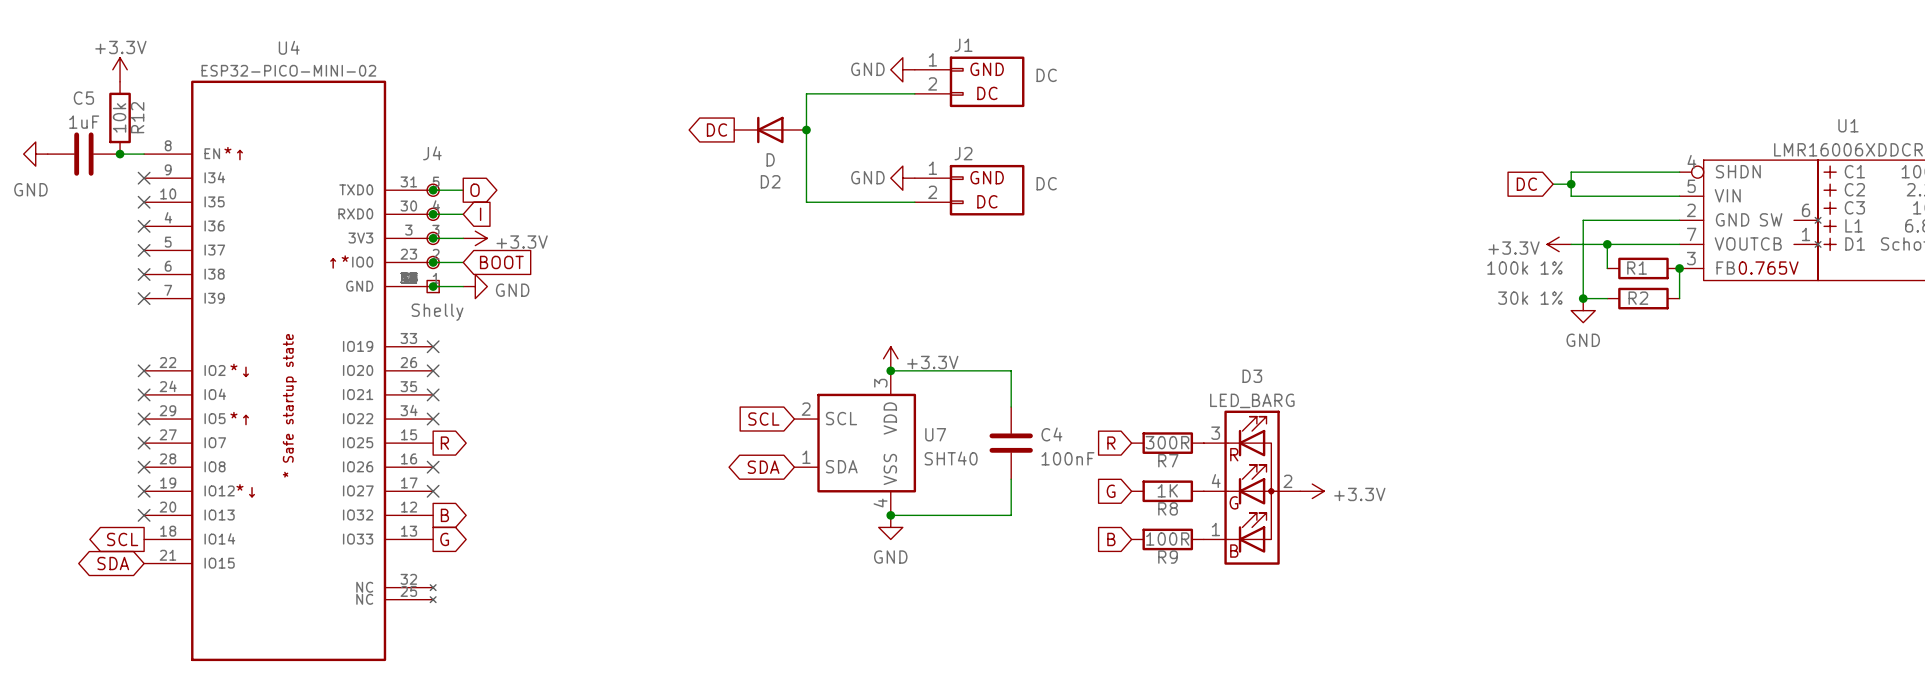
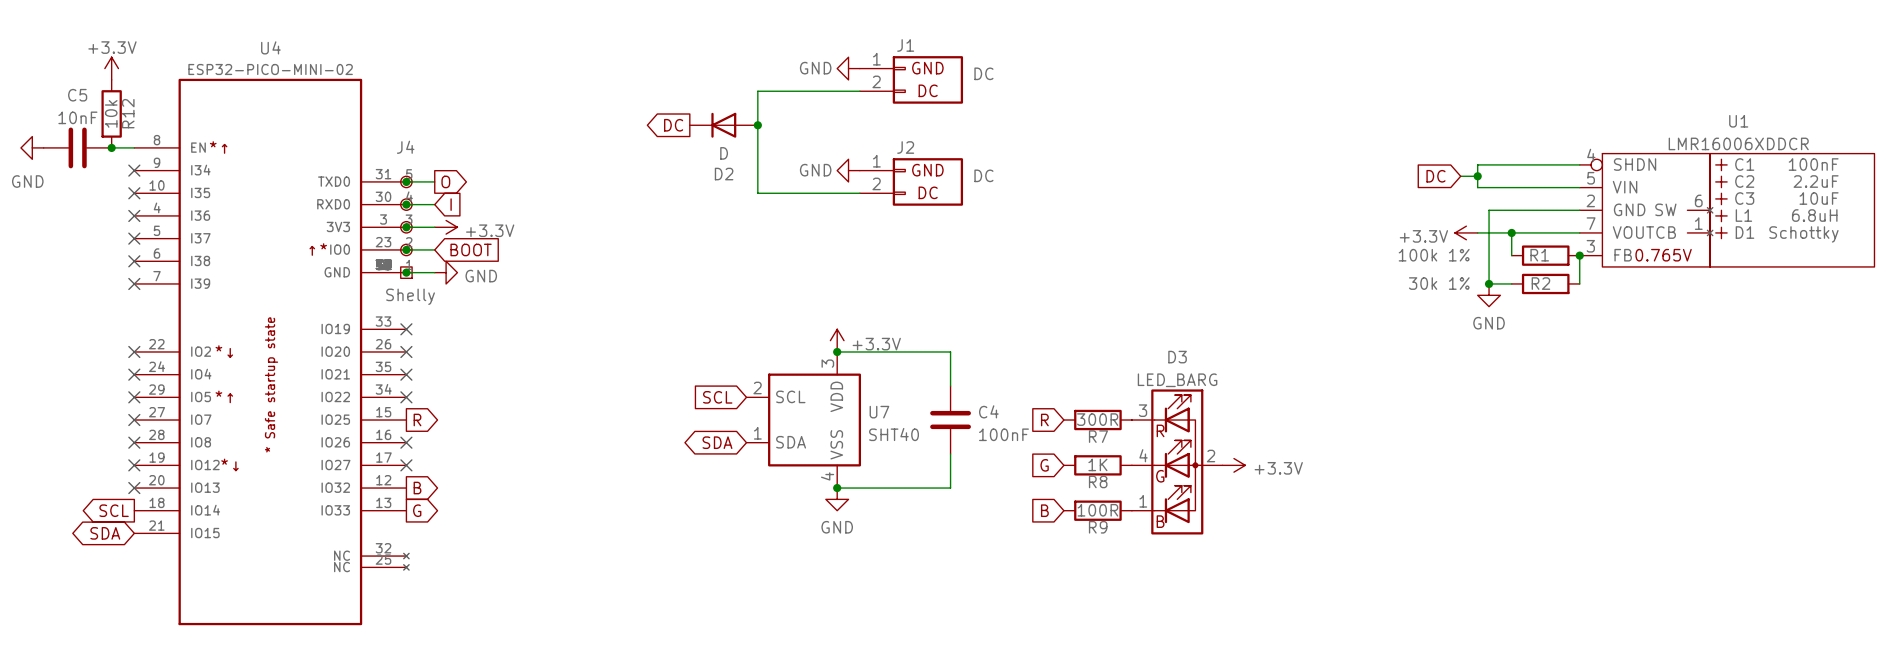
C5 value: 1uF (84, 122) -> 10nF (77, 117)

